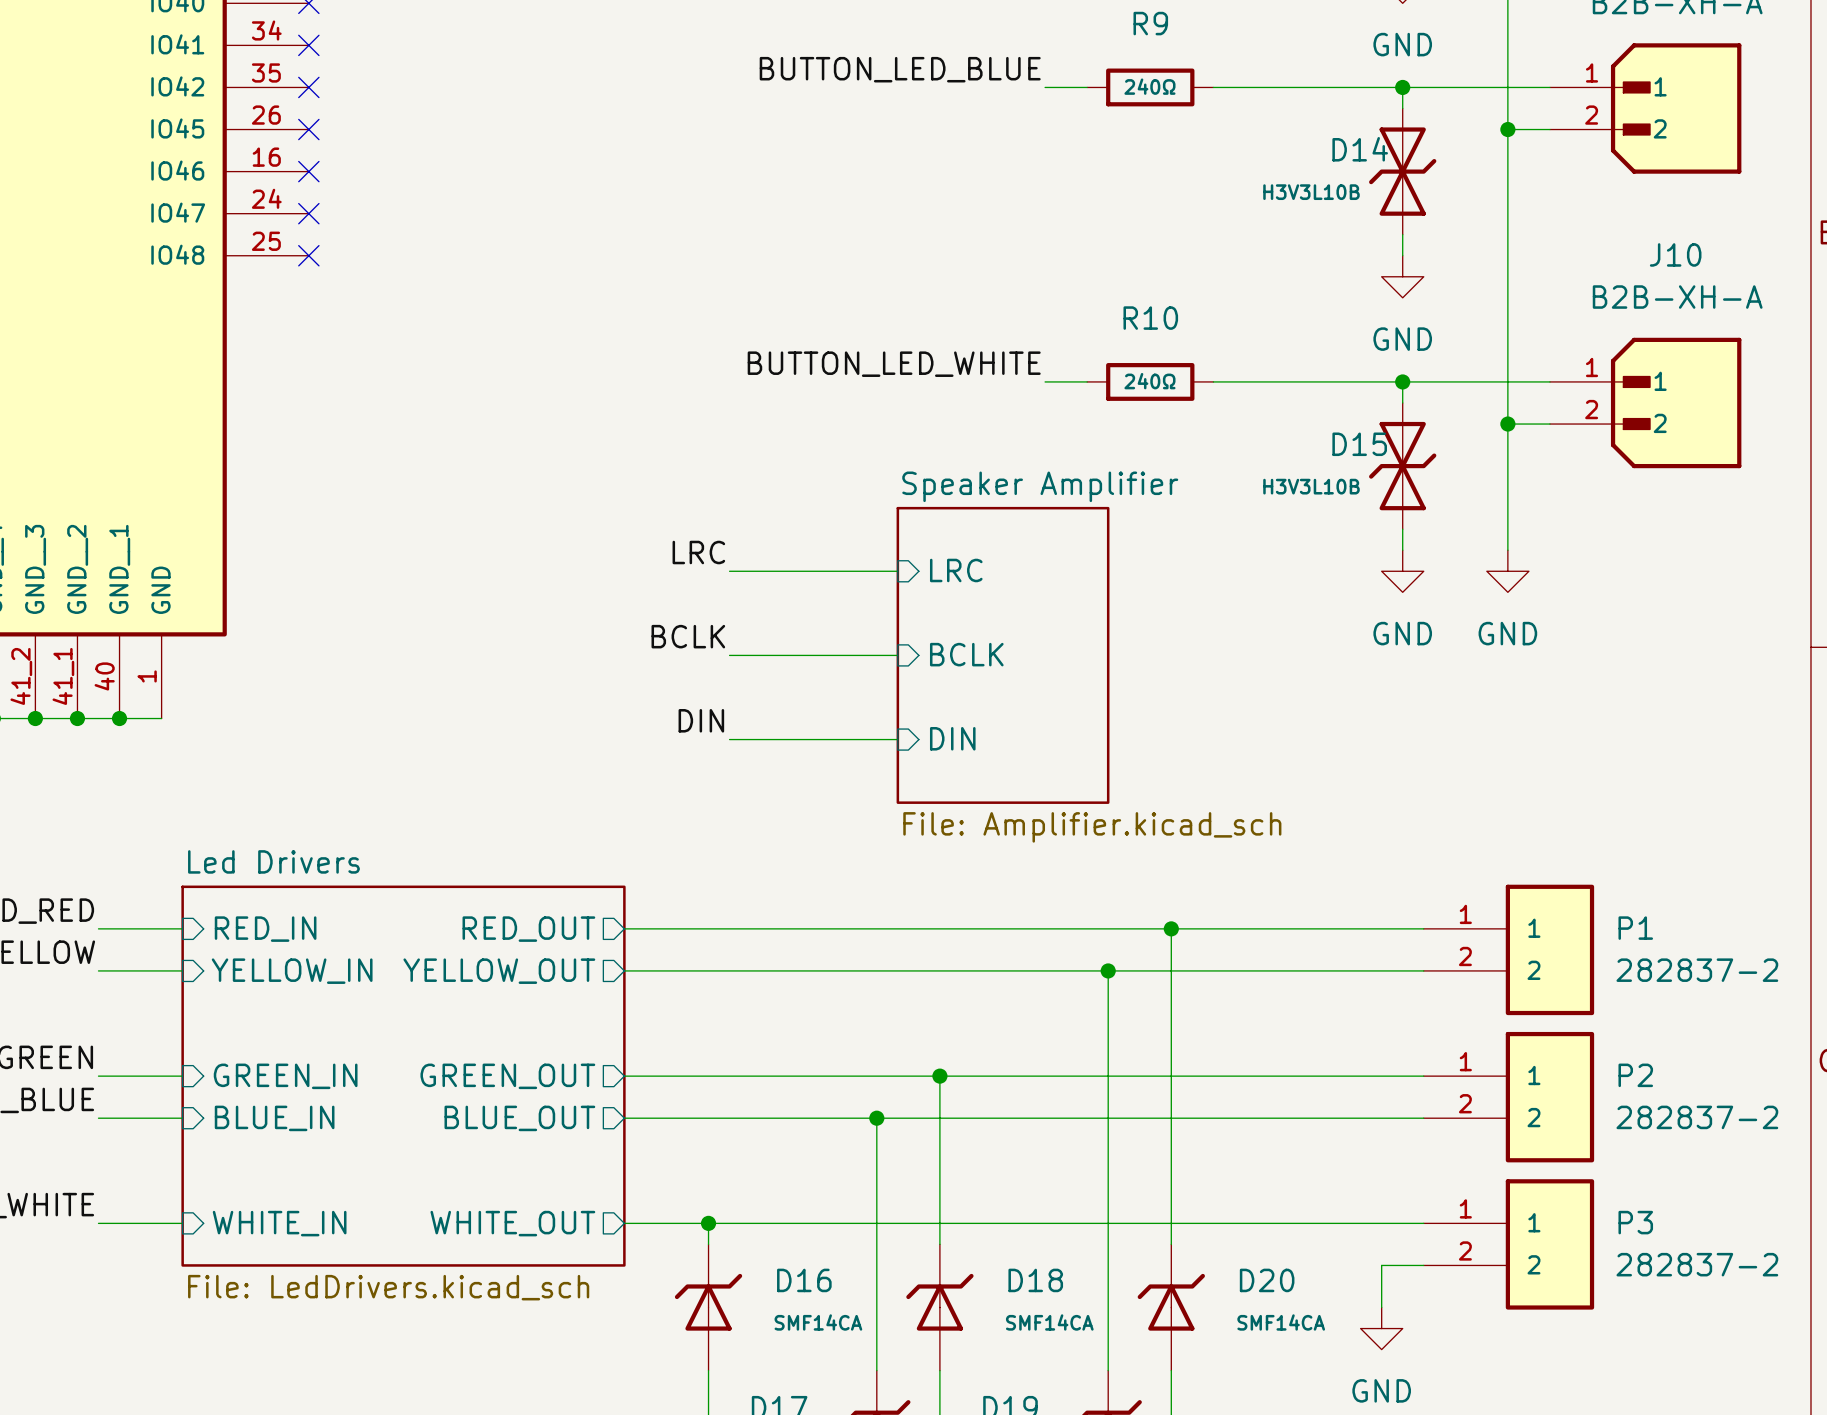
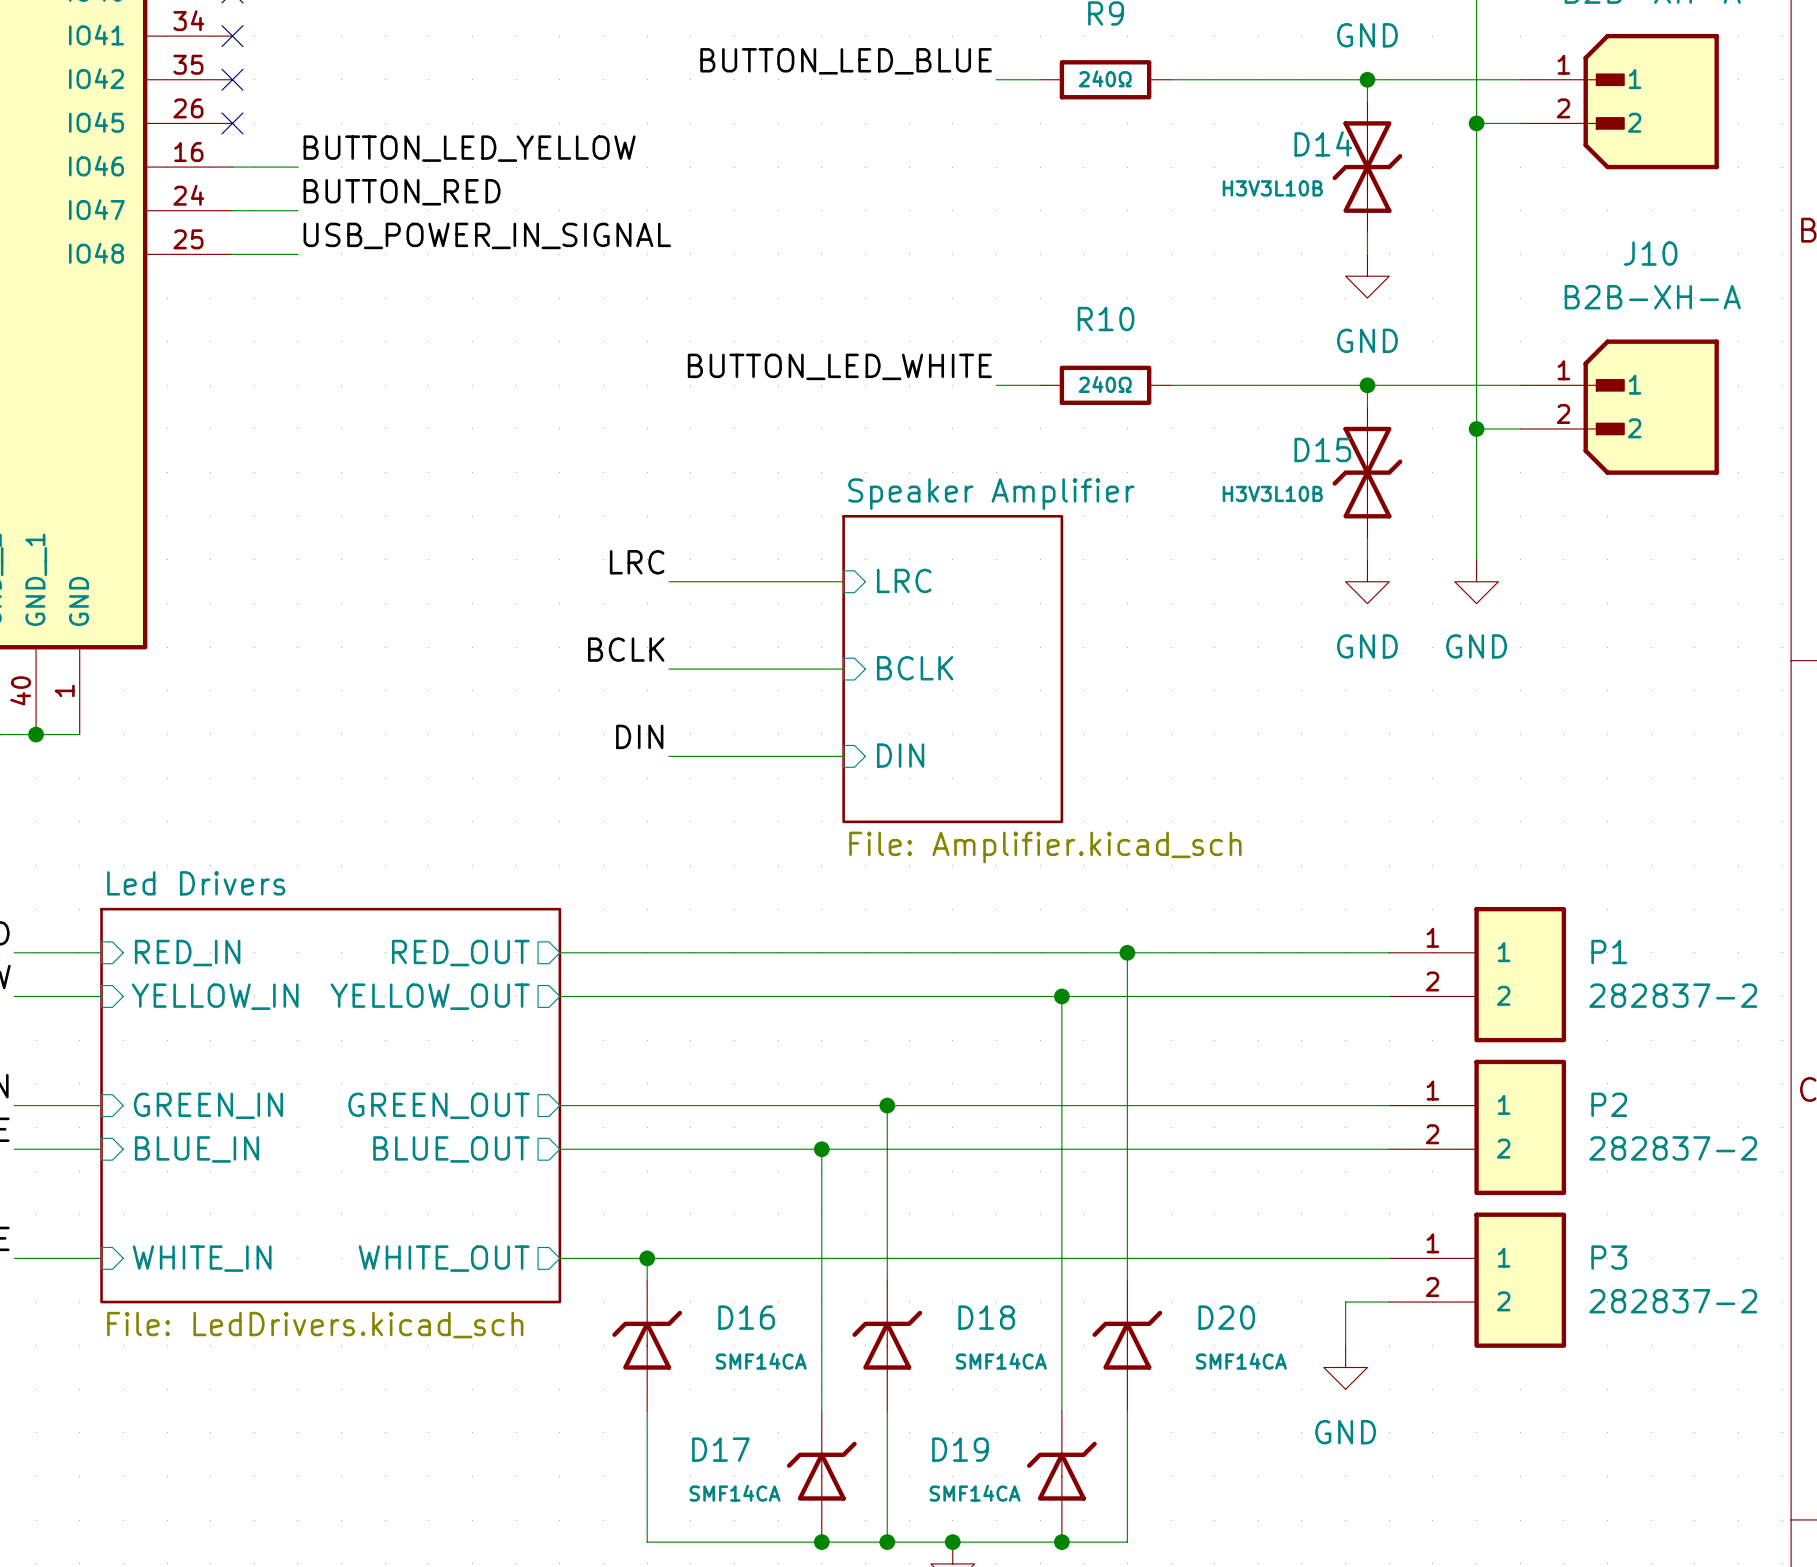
label: none -> BUTTON_LED_YELLOW (469, 148)
wire: none -> (232, 167) (297, 167)
no-connect mark: (308, 171) -> none
label: none -> BUTTON_RED (402, 192)
wire: none -> (232, 210) (297, 210)
no-connect mark: (308, 213) -> none
label: none -> USB_POWER_IN_SIGNAL (487, 235)
wire: none -> (232, 254) (297, 254)
no-connect mark: (308, 255) -> none

